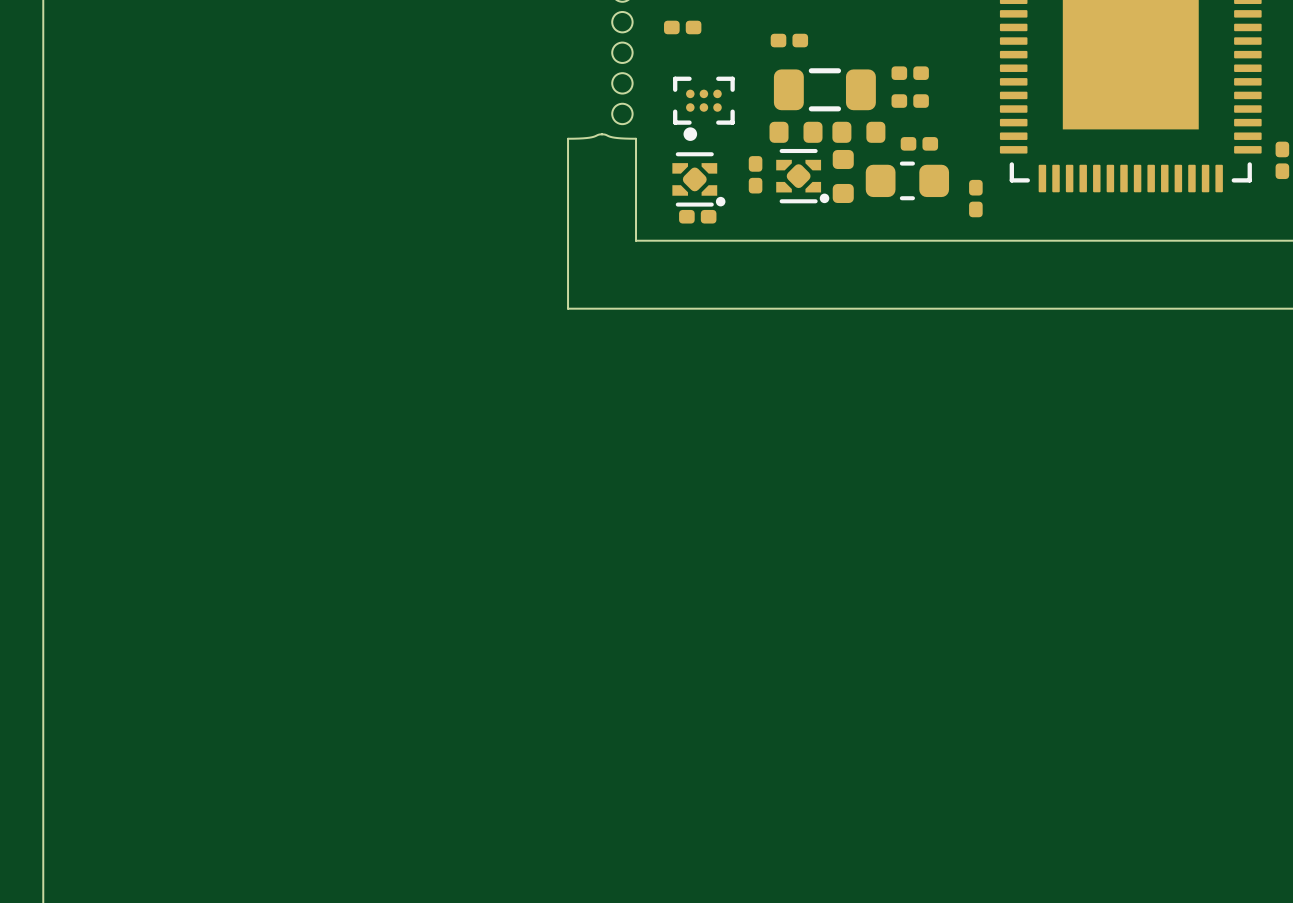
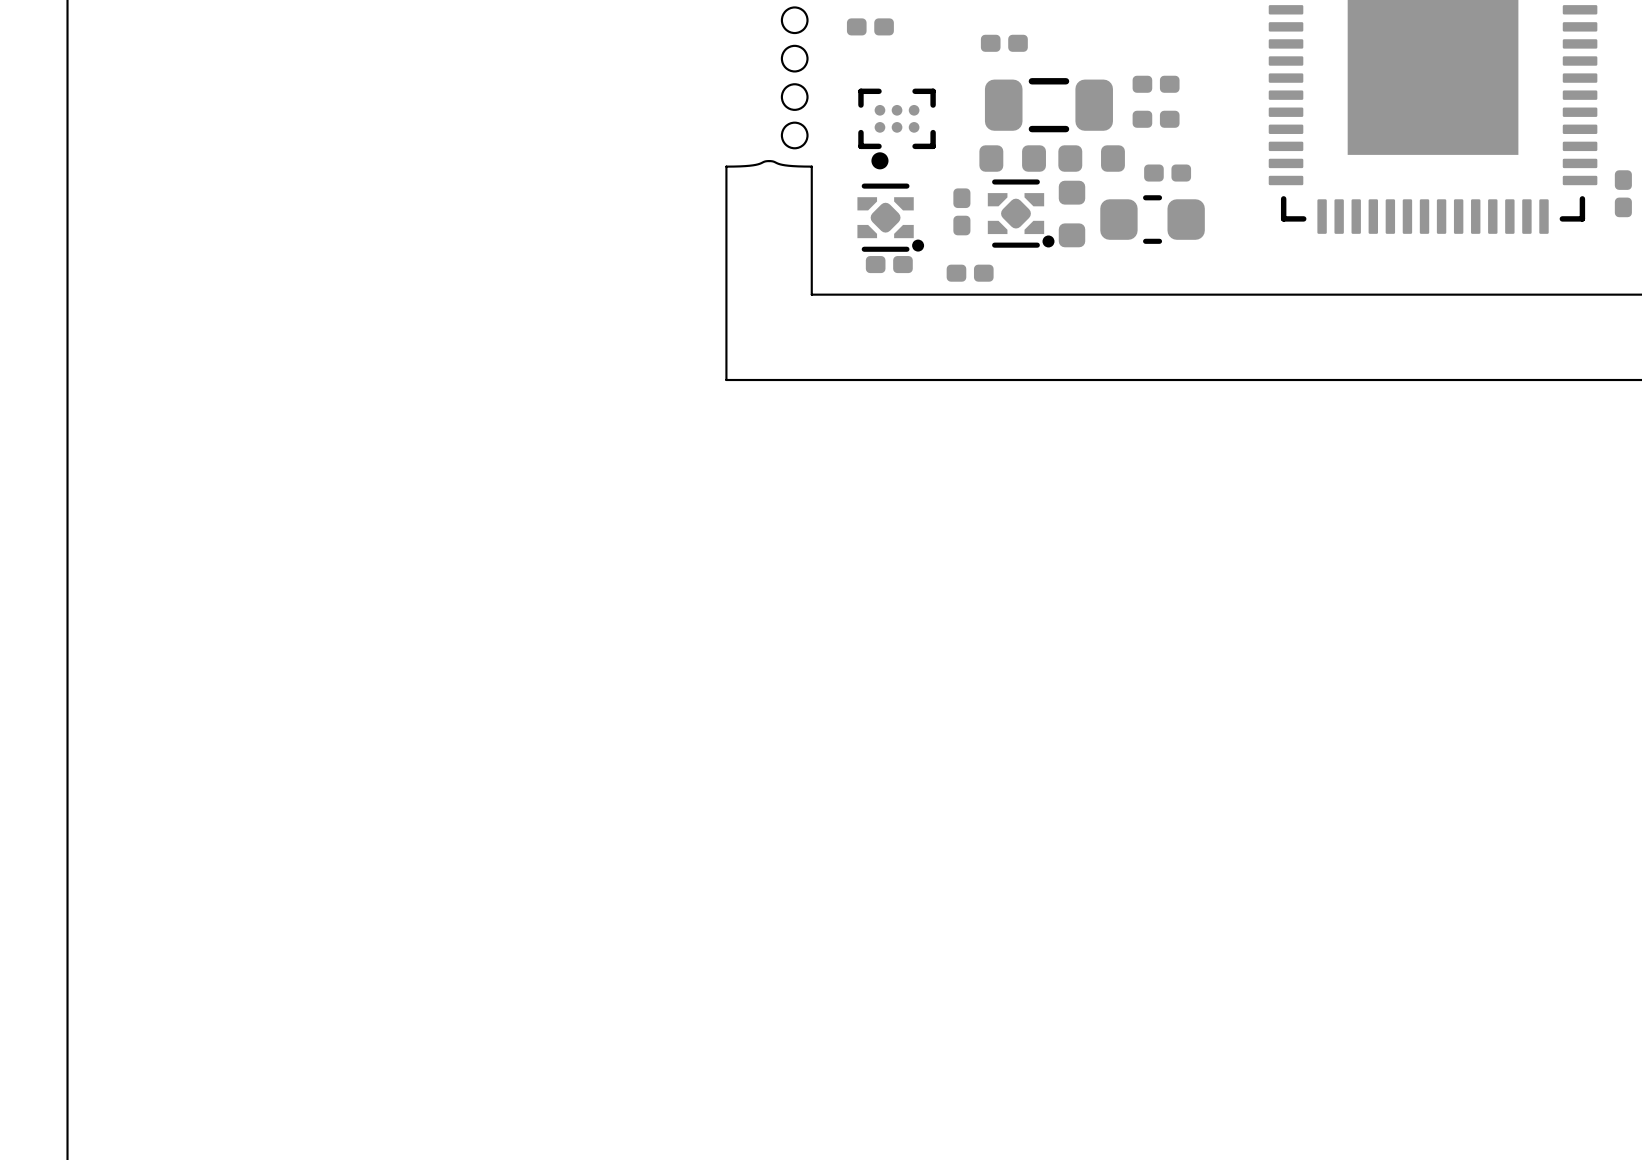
part: (975, 198) -> none
part: none -> (970, 273)

